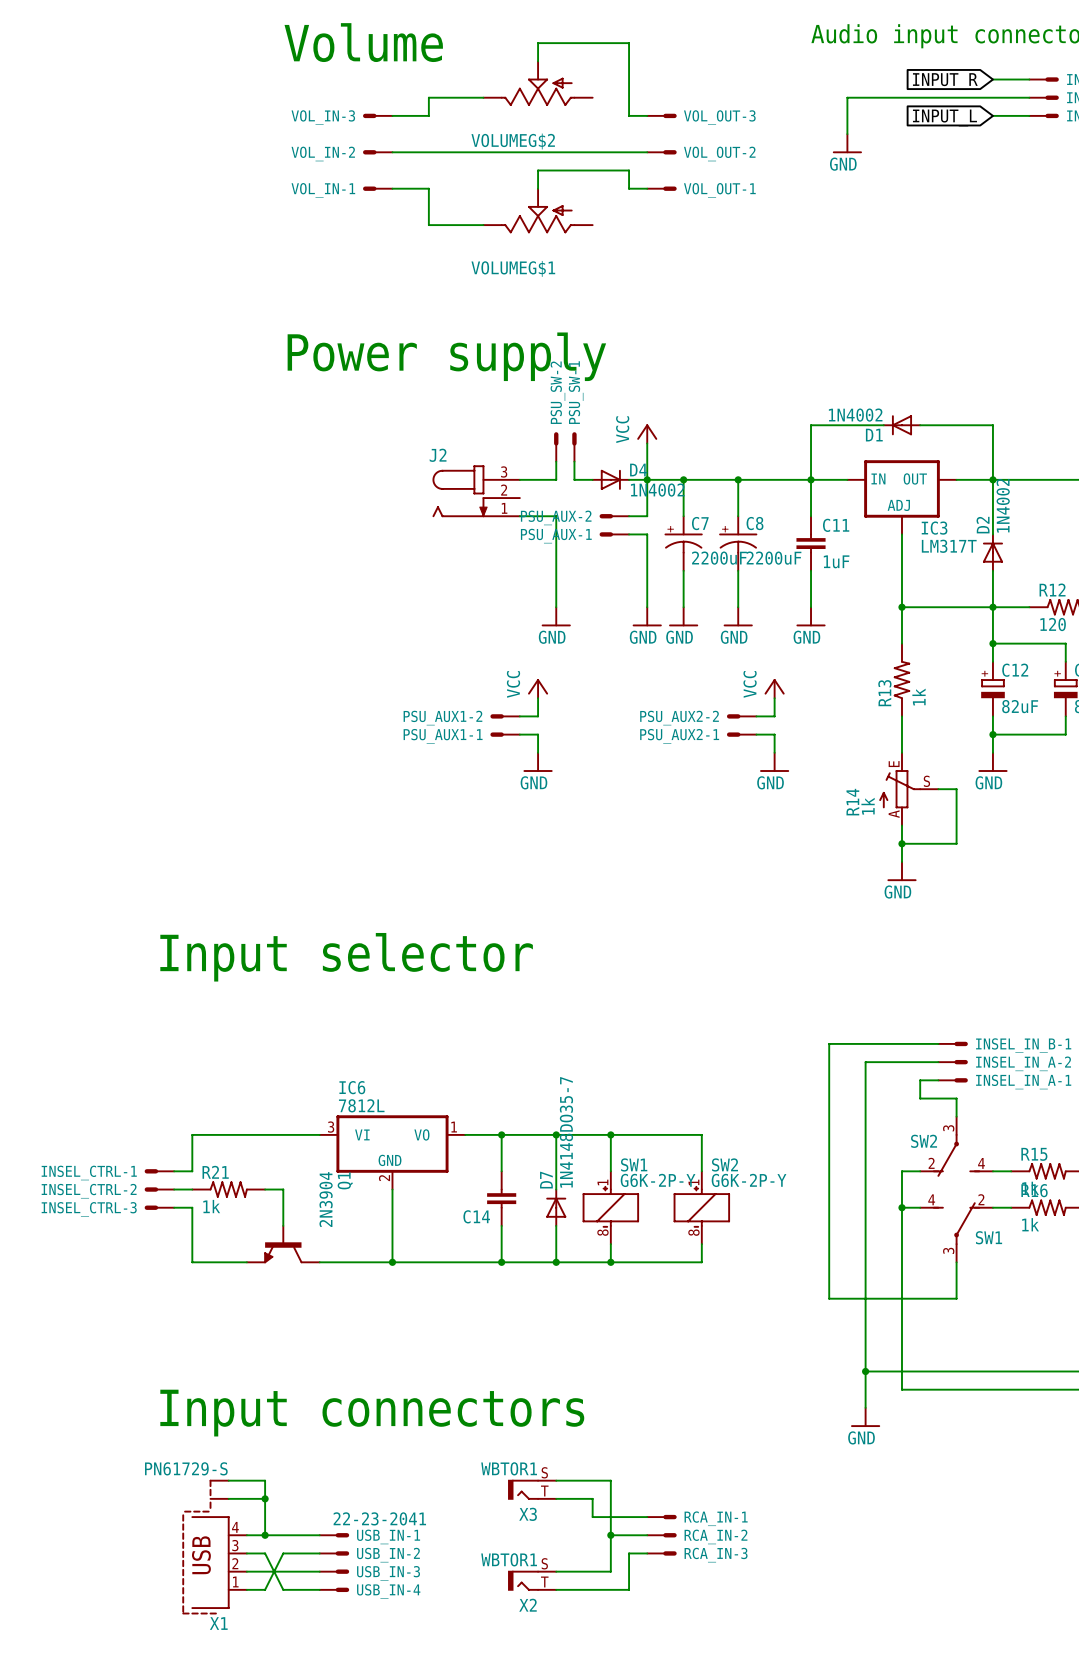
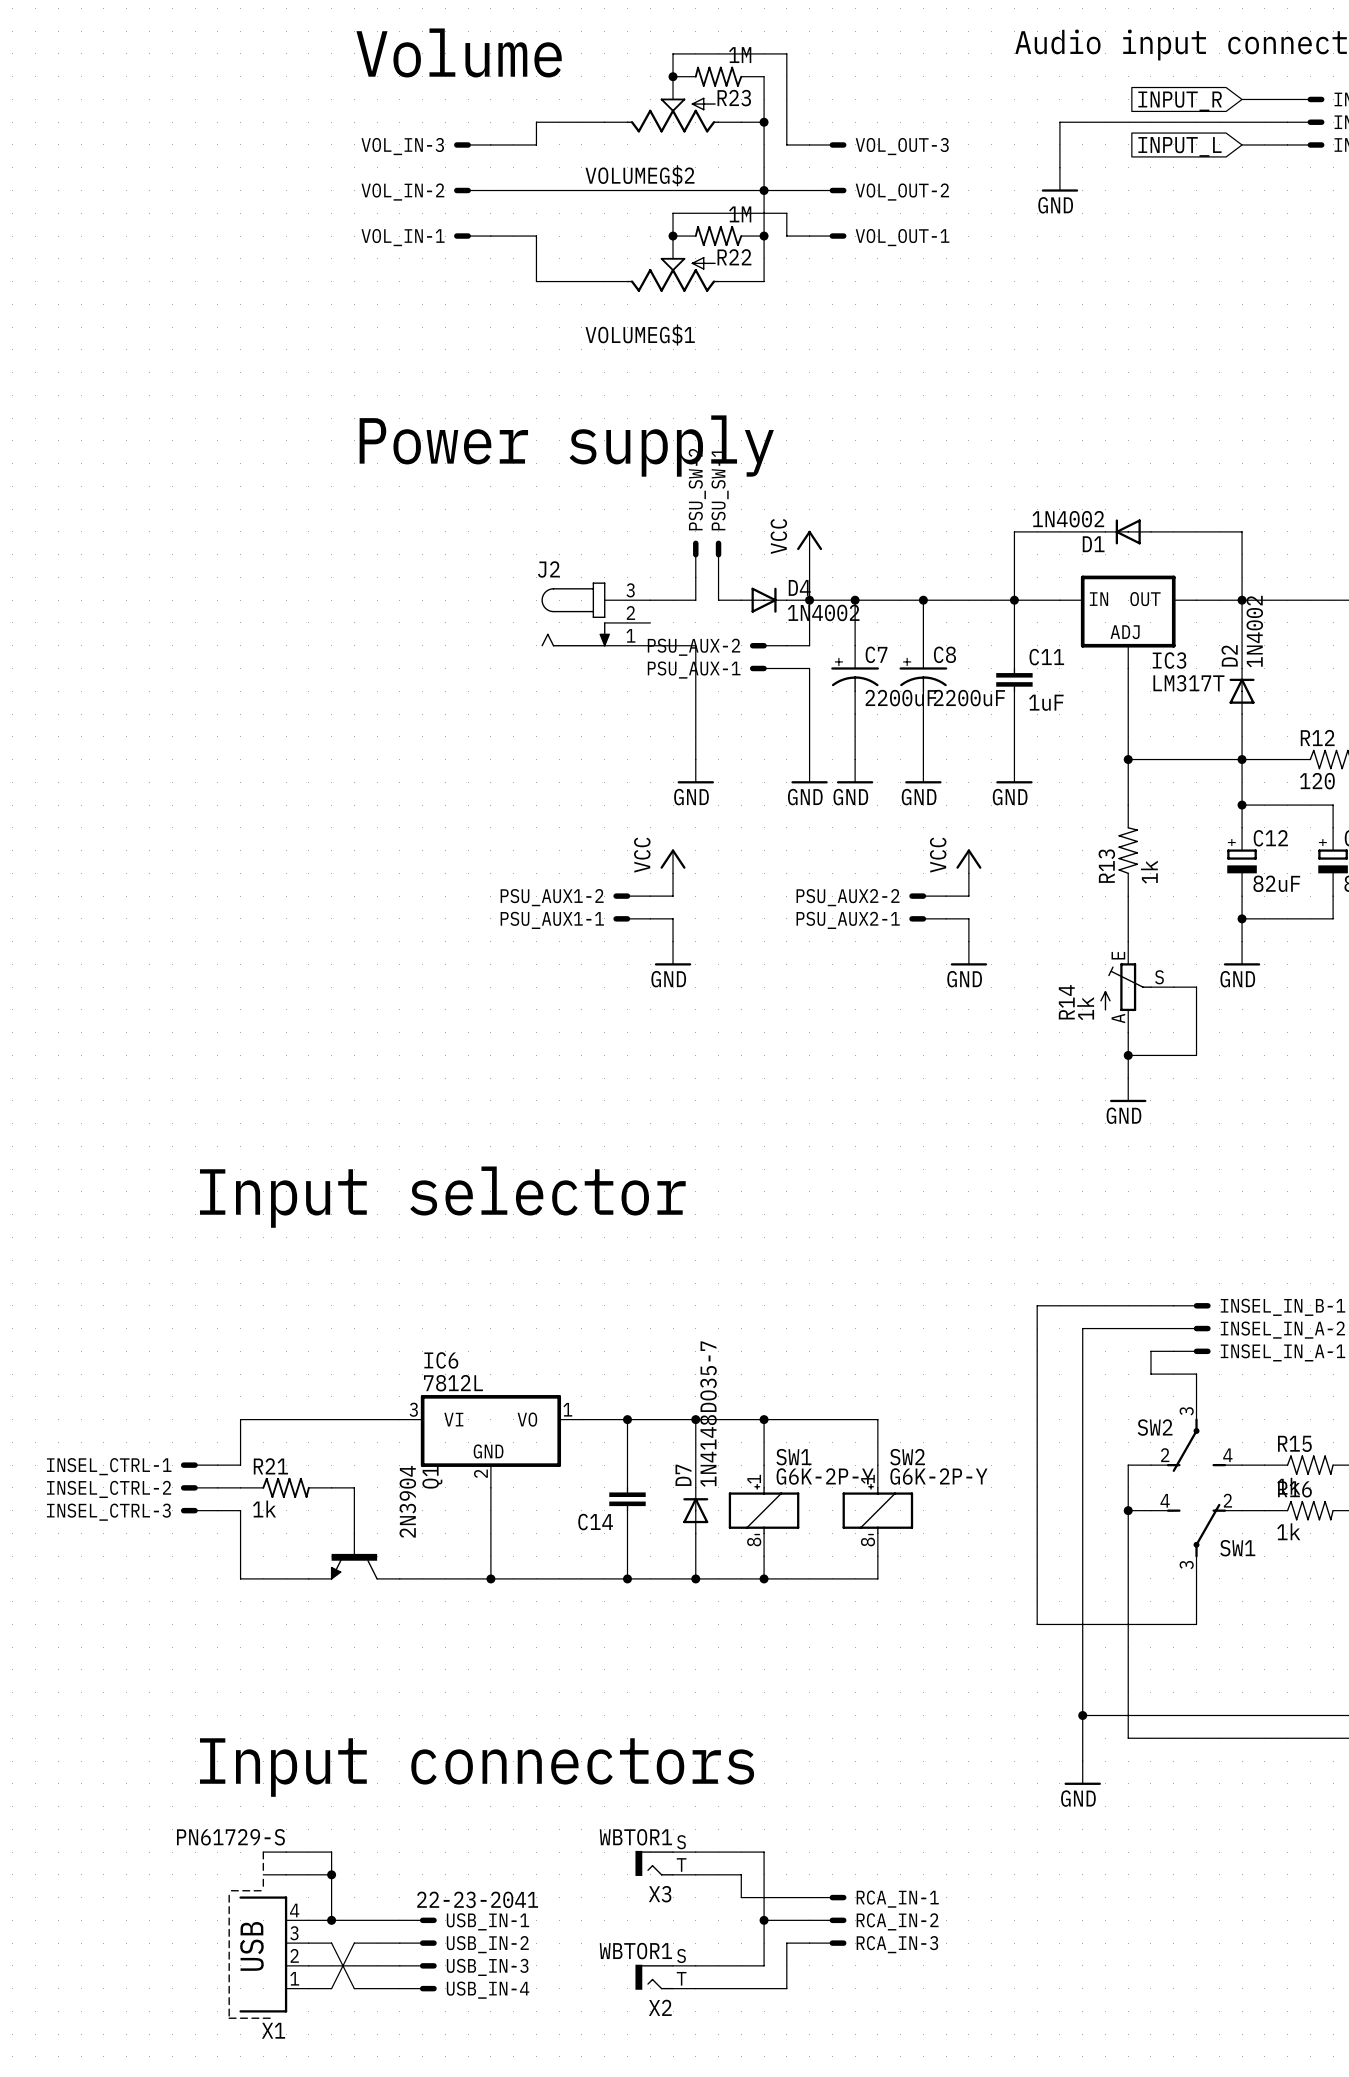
junction: none -> (673, 76)
R23: none -> 1M (718, 76)
wire: none -> (764, 76) (764, 281) (741, 281)
wire: none -> (741, 122) (764, 122)
junction: none -> (764, 122)
junction: none -> (764, 190)
junction: none -> (673, 236)
R22: none -> 1M (718, 236)
junction: none -> (764, 236)

